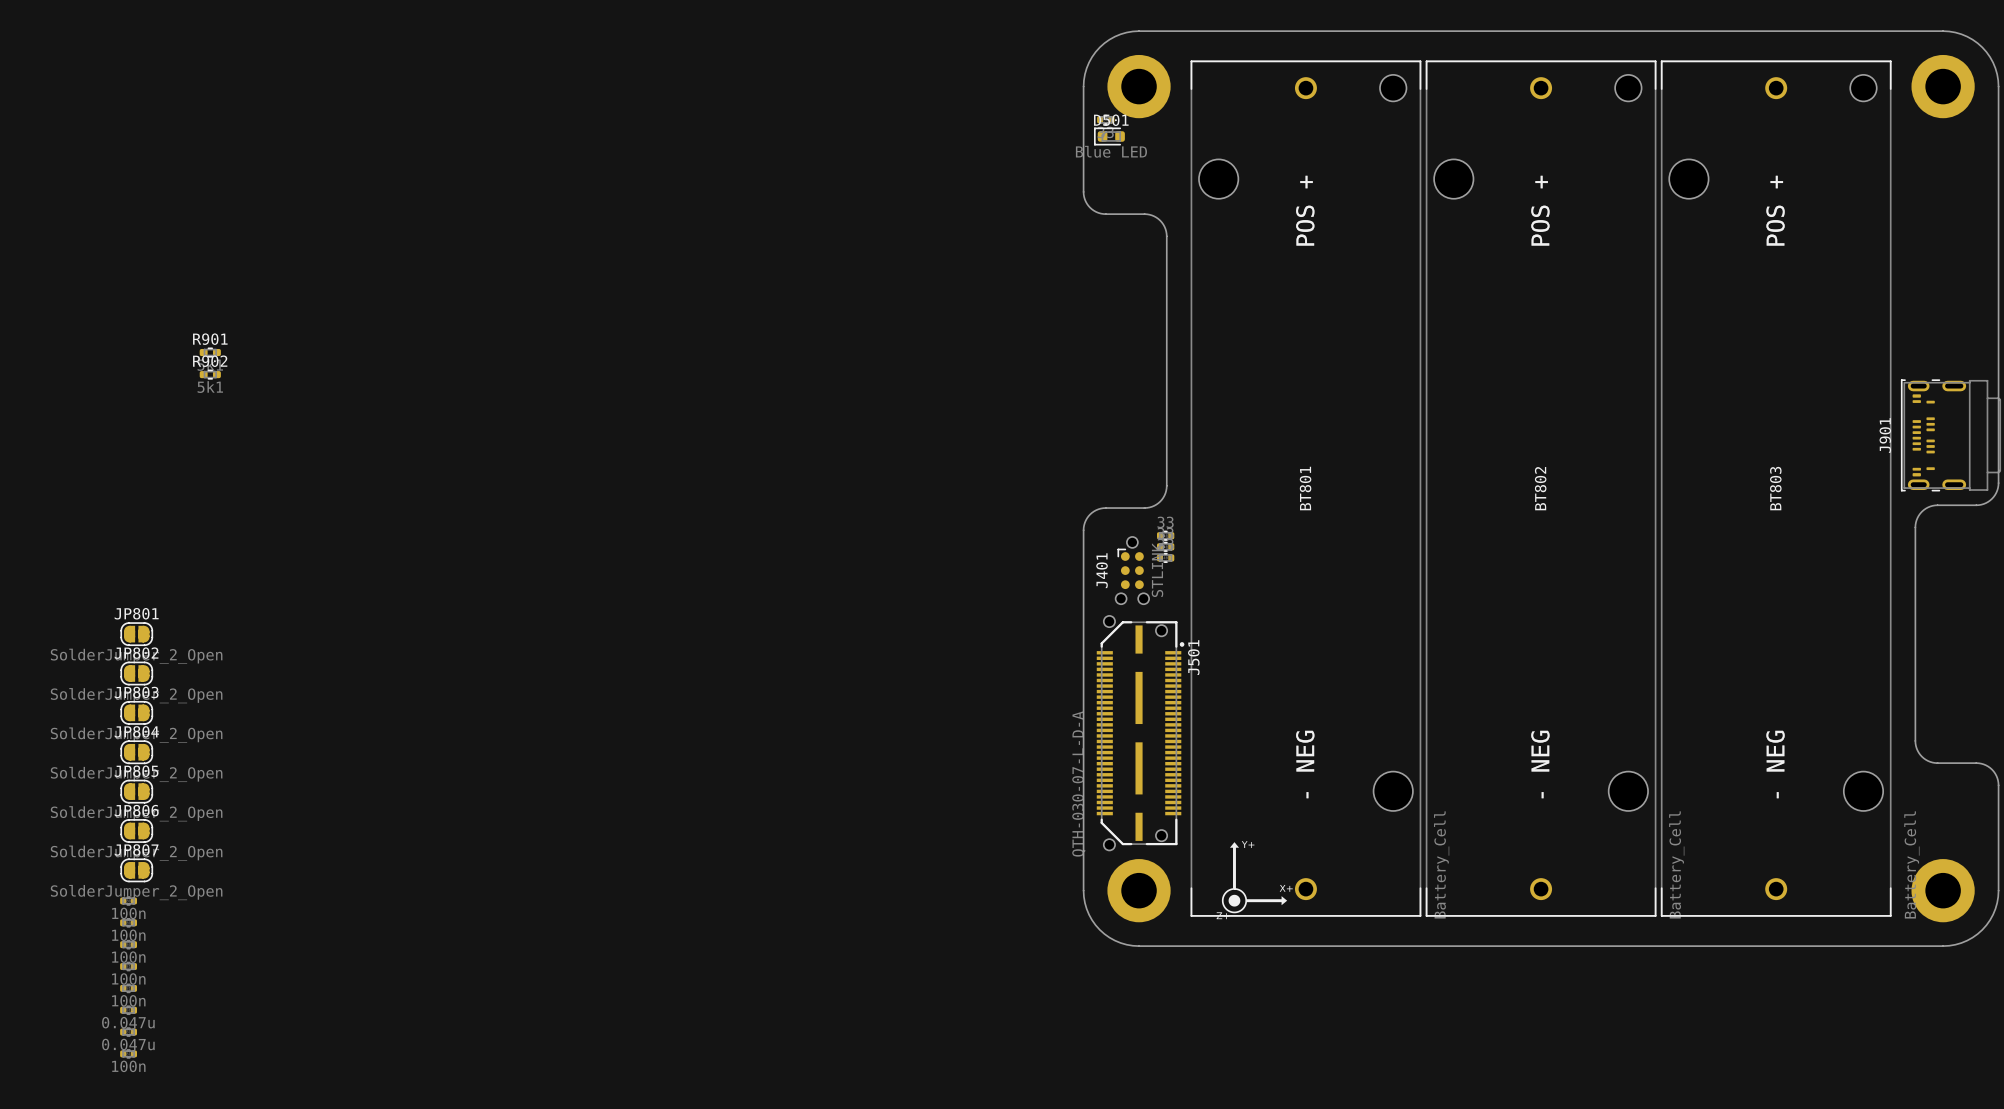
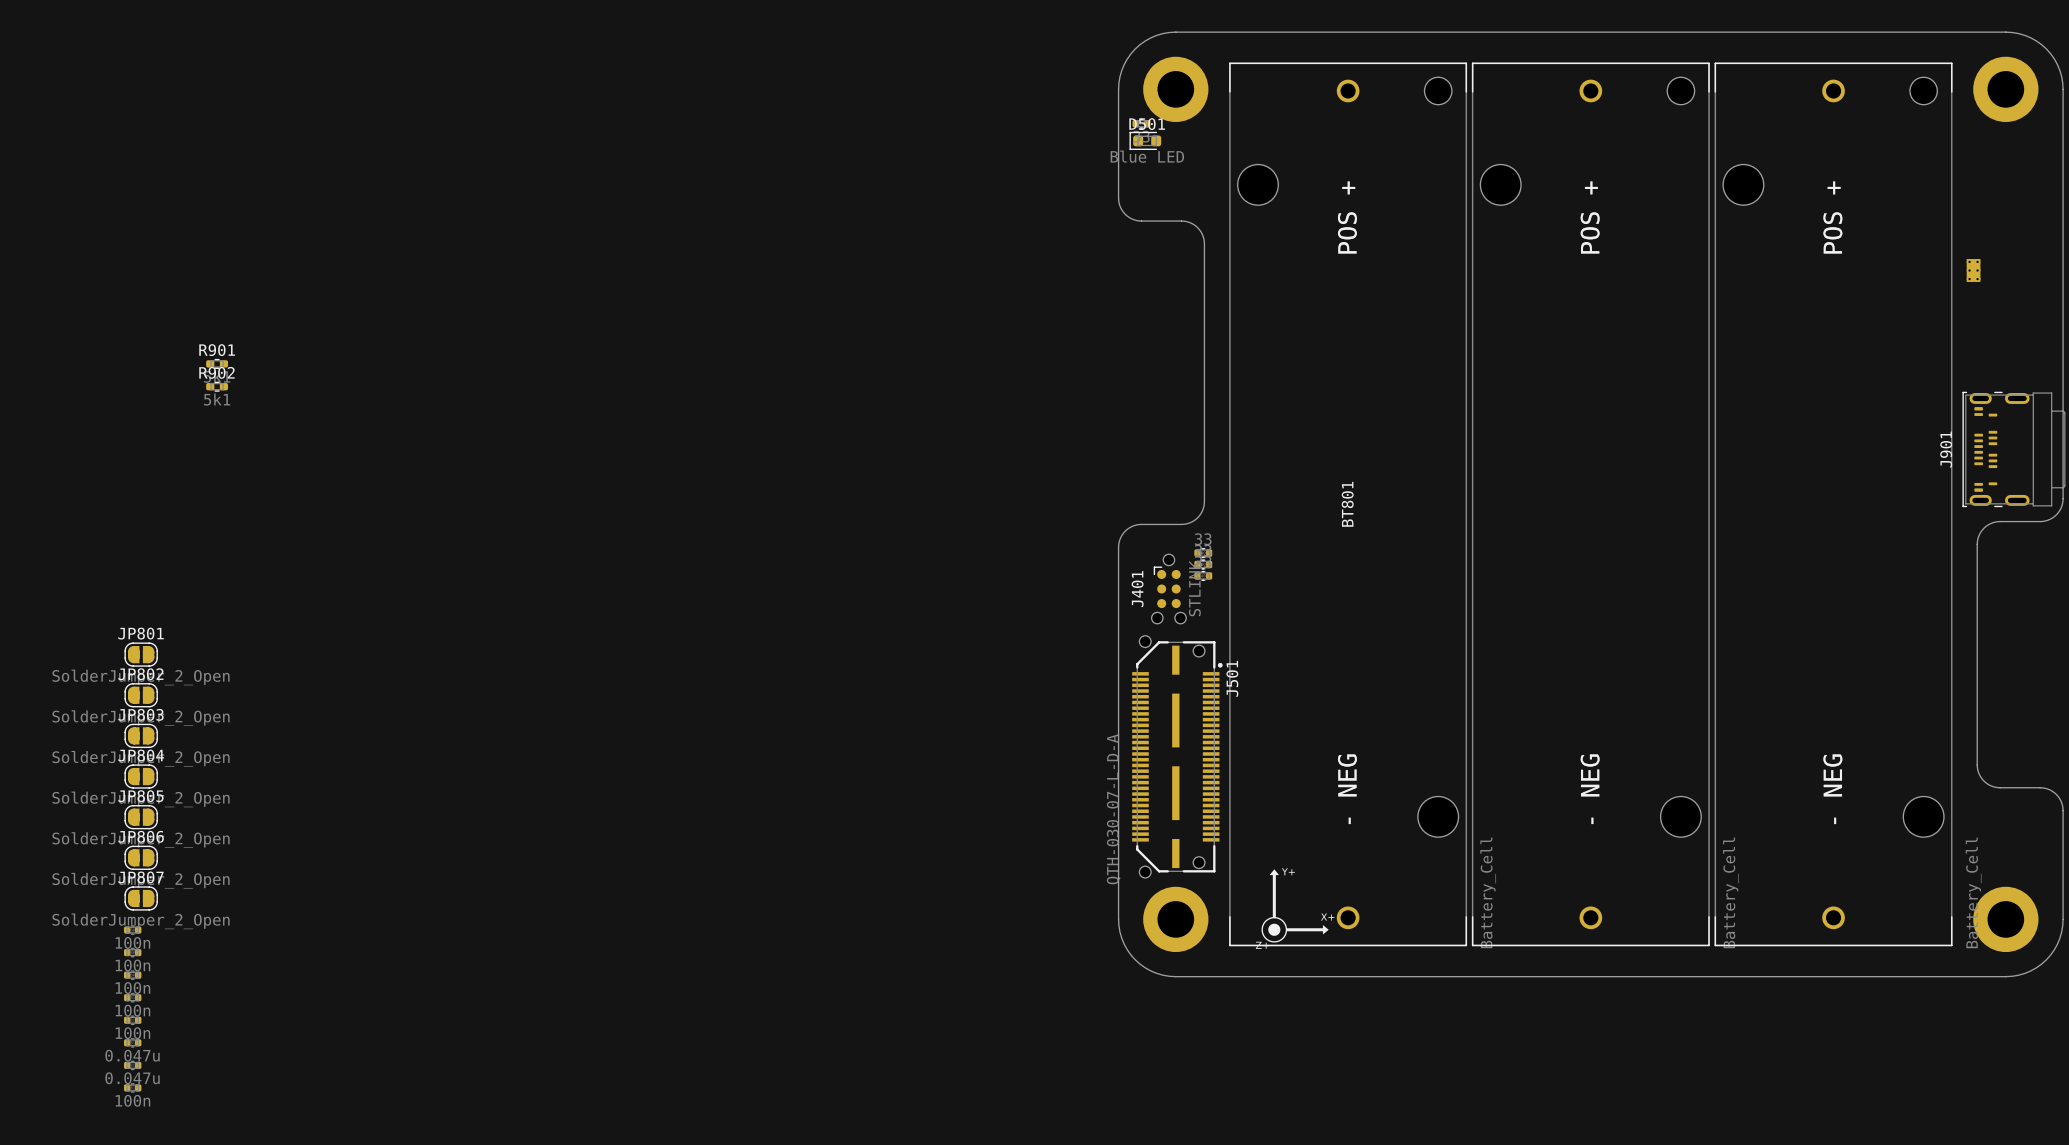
part: none -> (1973, 270)
BT802 name: BT802 (1540, 488) -> none
BT803 name: BT803 (1775, 488) -> none

